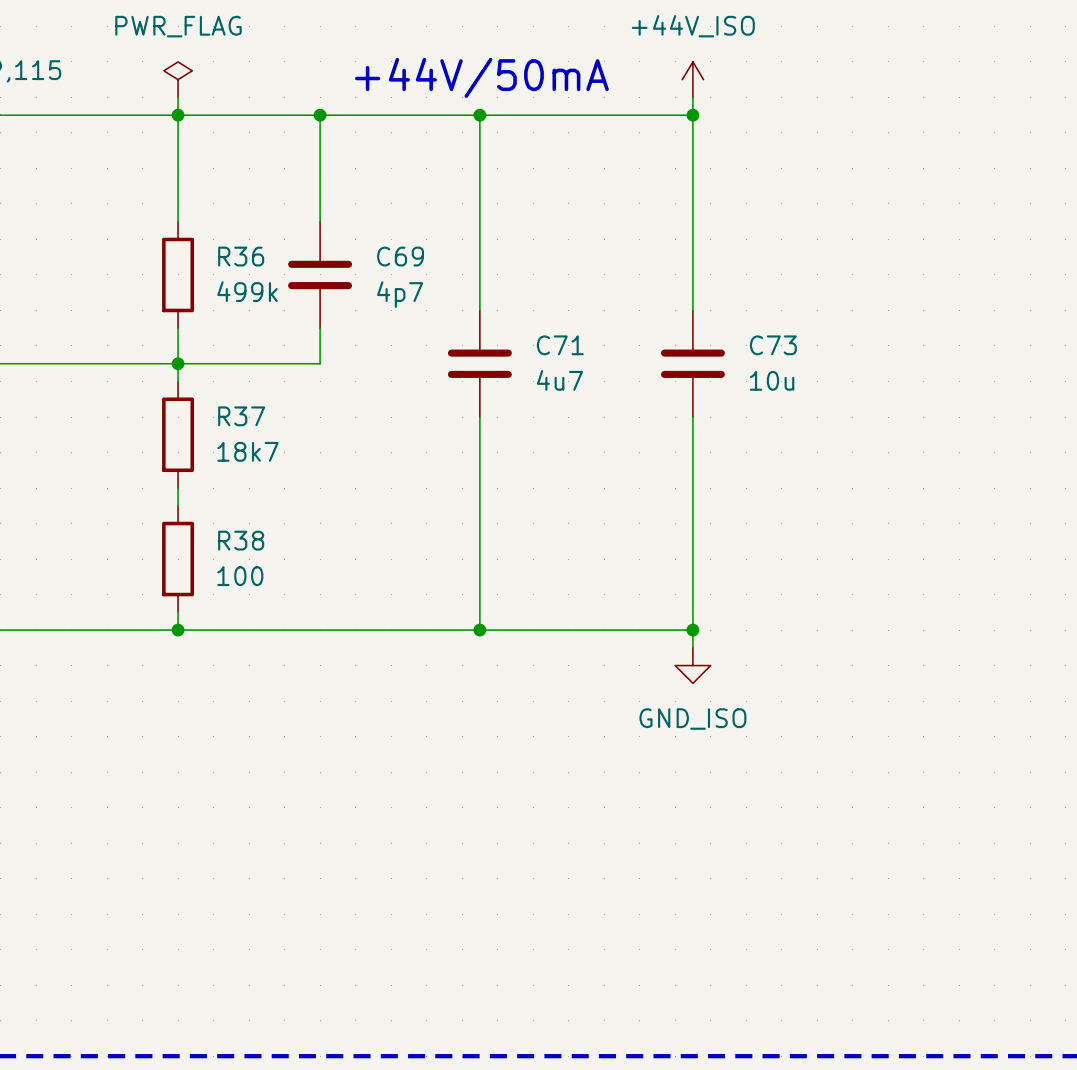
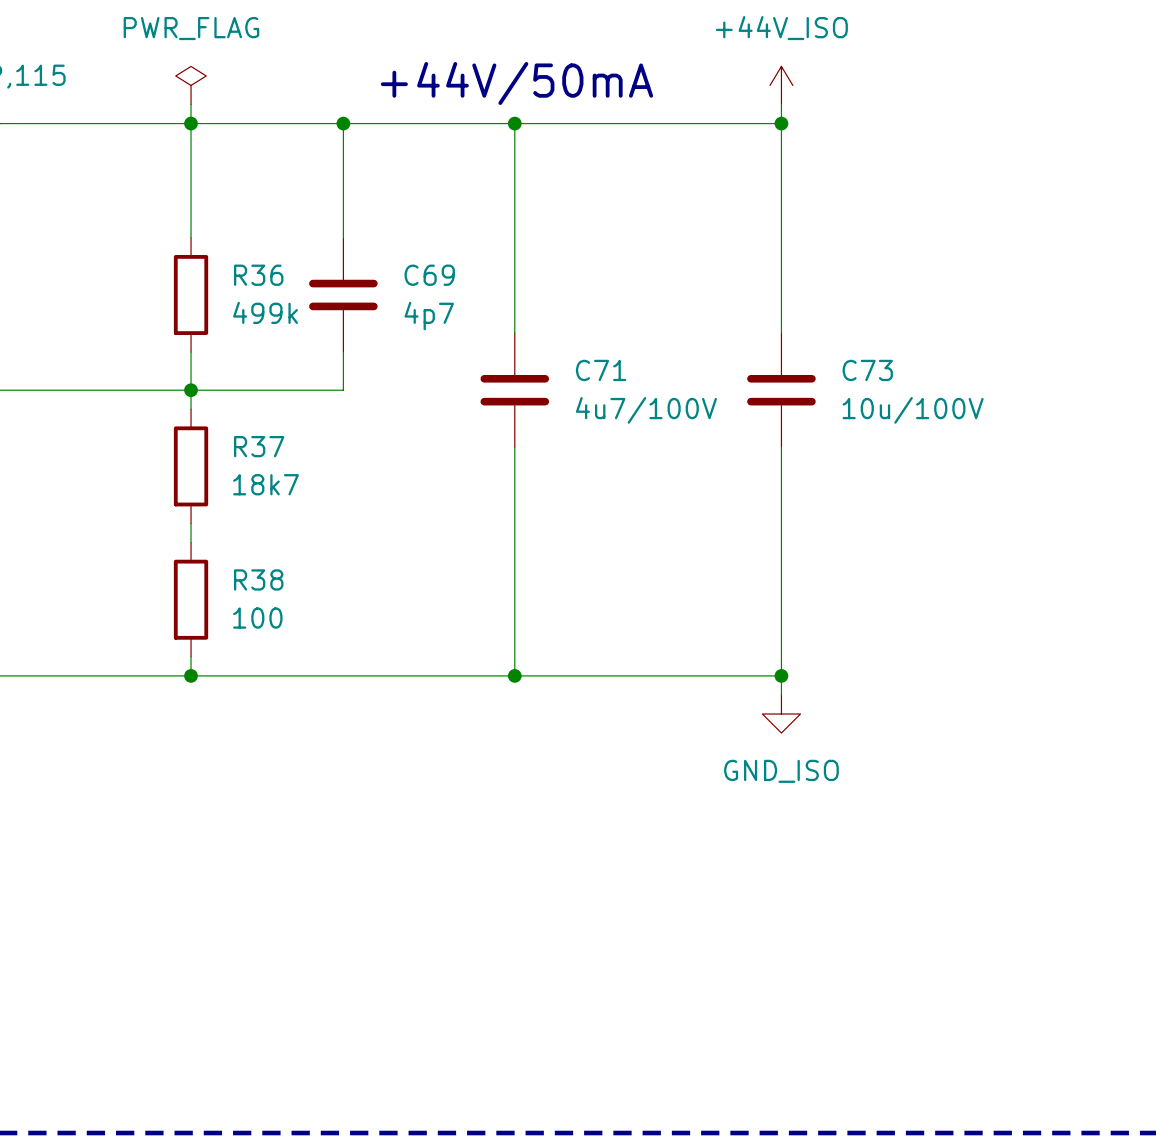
power symbol position: +44V_ISO (692, 79) -> +44V_ISO (781, 85)
wire: (692, 97) (692, 310) -> (781, 104) (781, 333)
wire: none -> (743, 123) (781, 123)
junction position: (692, 115) -> (781, 123)
C73 position: (692, 363) -> (781, 390)
C71 value: 4u7 (559, 380) -> 4u7/100V (646, 410)
C73 value: 10u (772, 380) -> 10u/100V (913, 410)
wire: (692, 417) (692, 647) -> (781, 447) (781, 694)
wire: none -> (743, 675) (781, 675)
junction position: (692, 630) -> (781, 675)
power symbol position: GND_ISO (692, 665) -> GND_ISO (781, 714)

